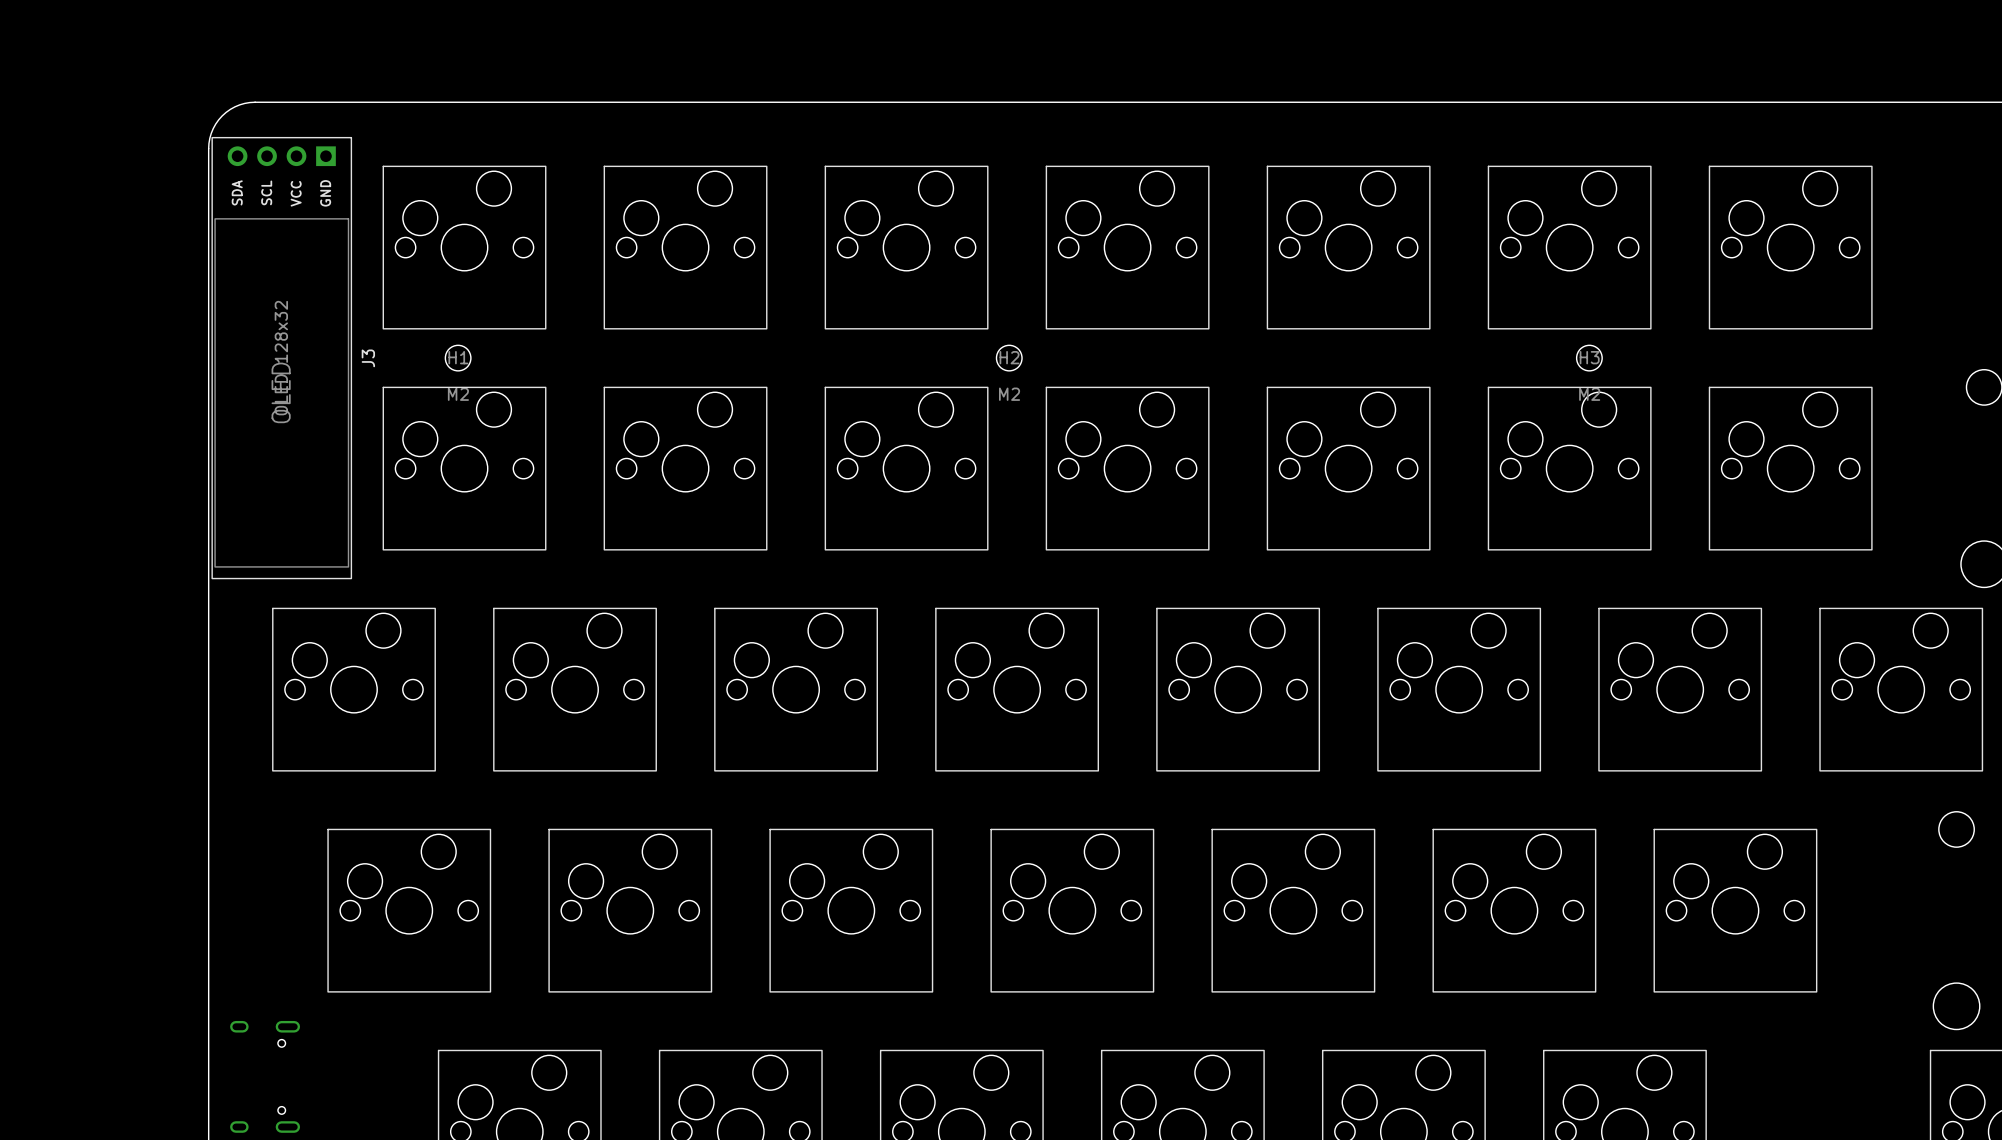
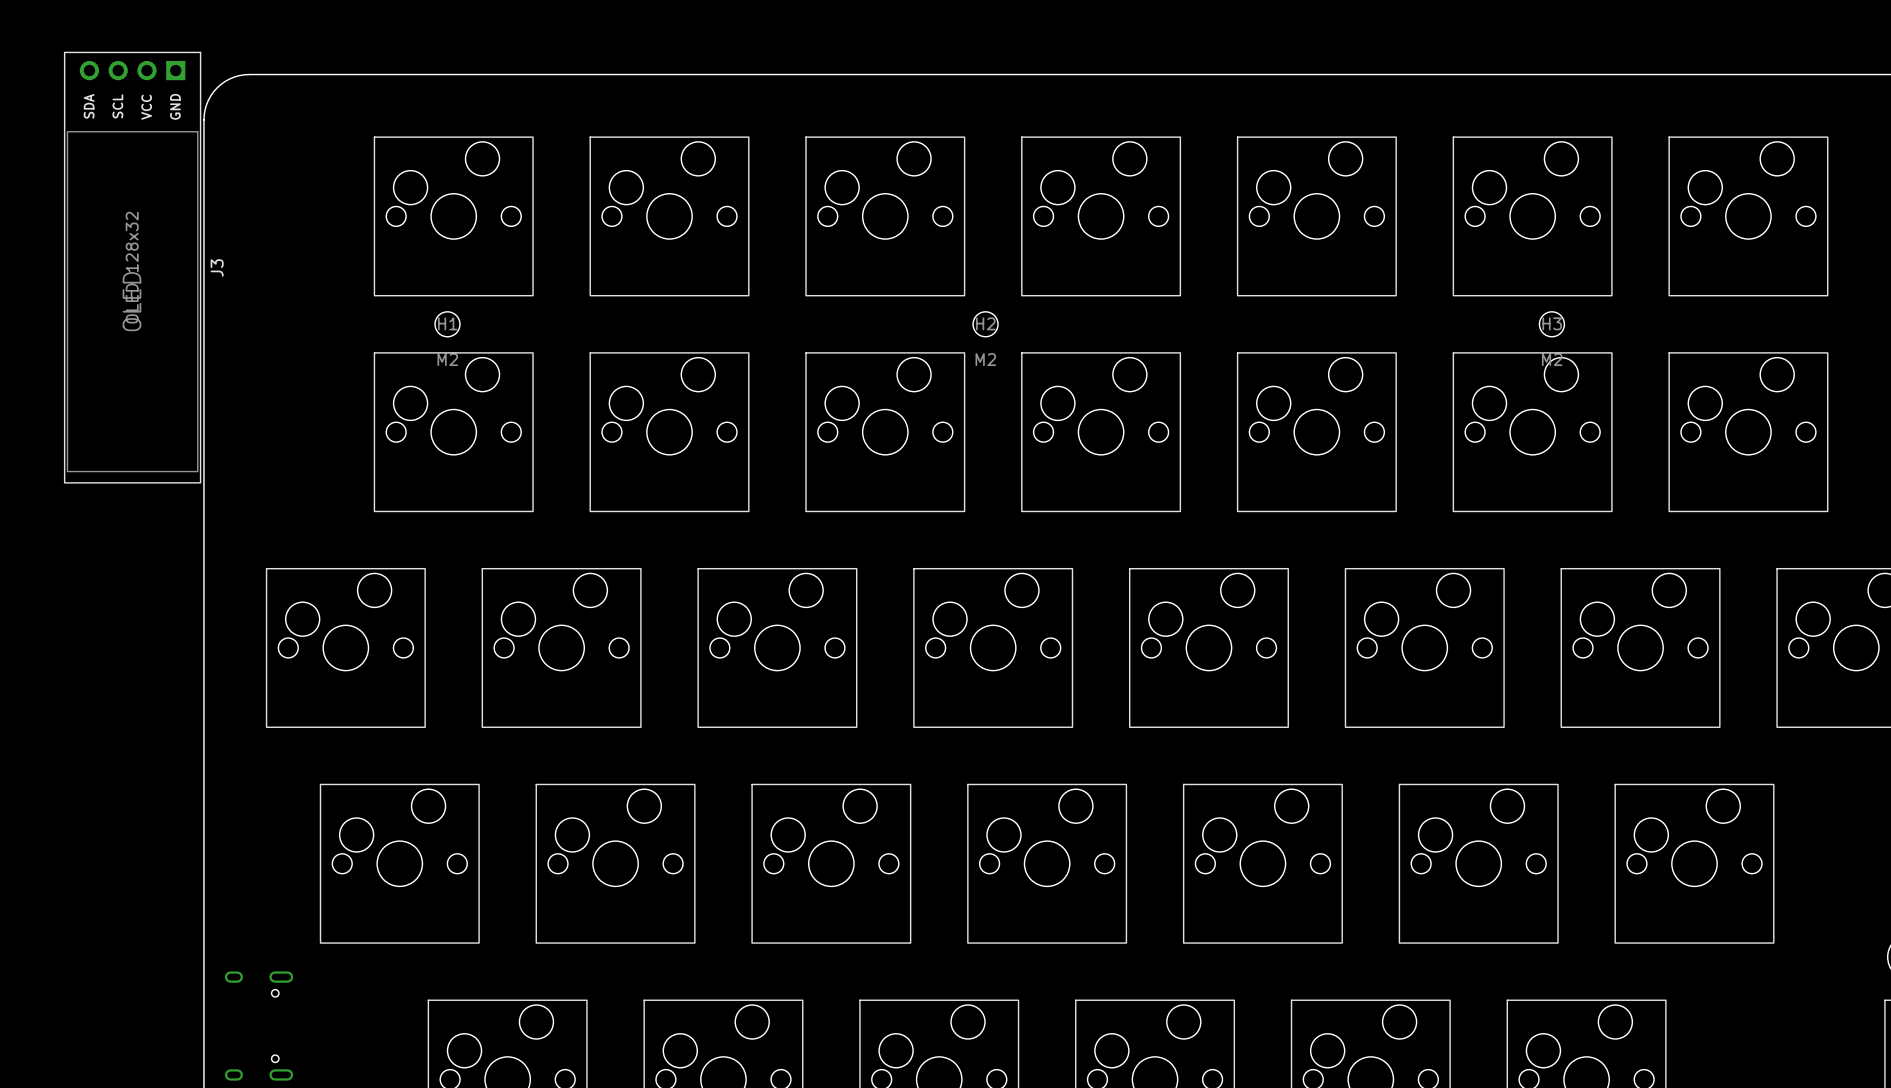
J3 position: (281, 358) -> (132, 267)

